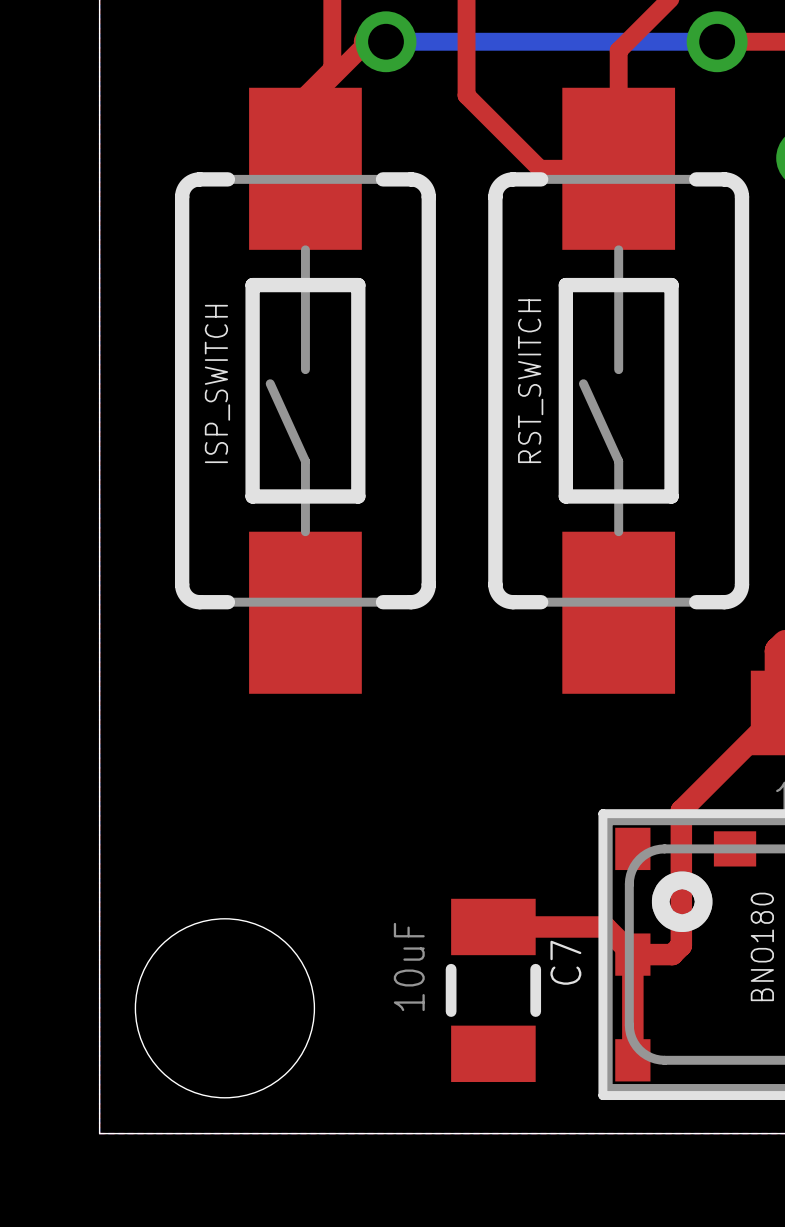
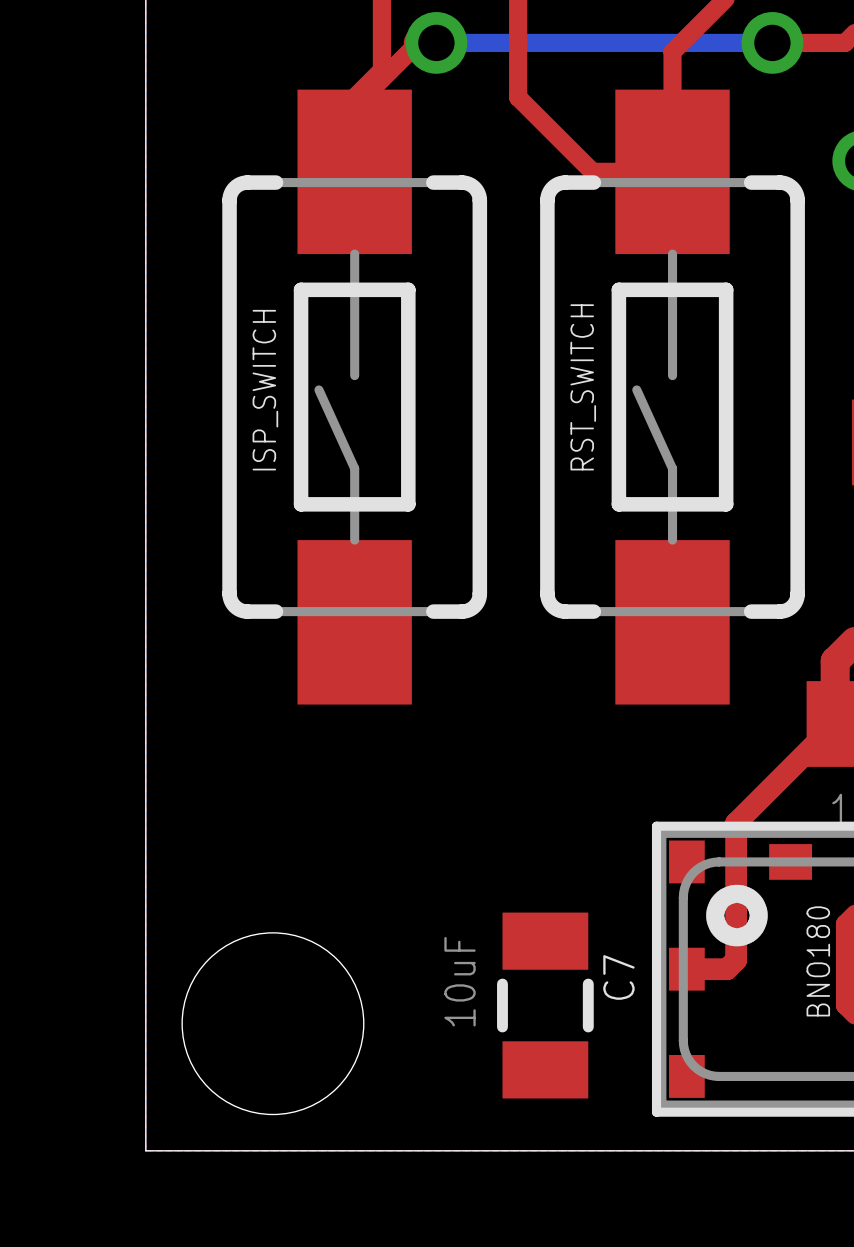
top track: (493, 926) (605, 926) (632, 954) (632, 1060) -> none

